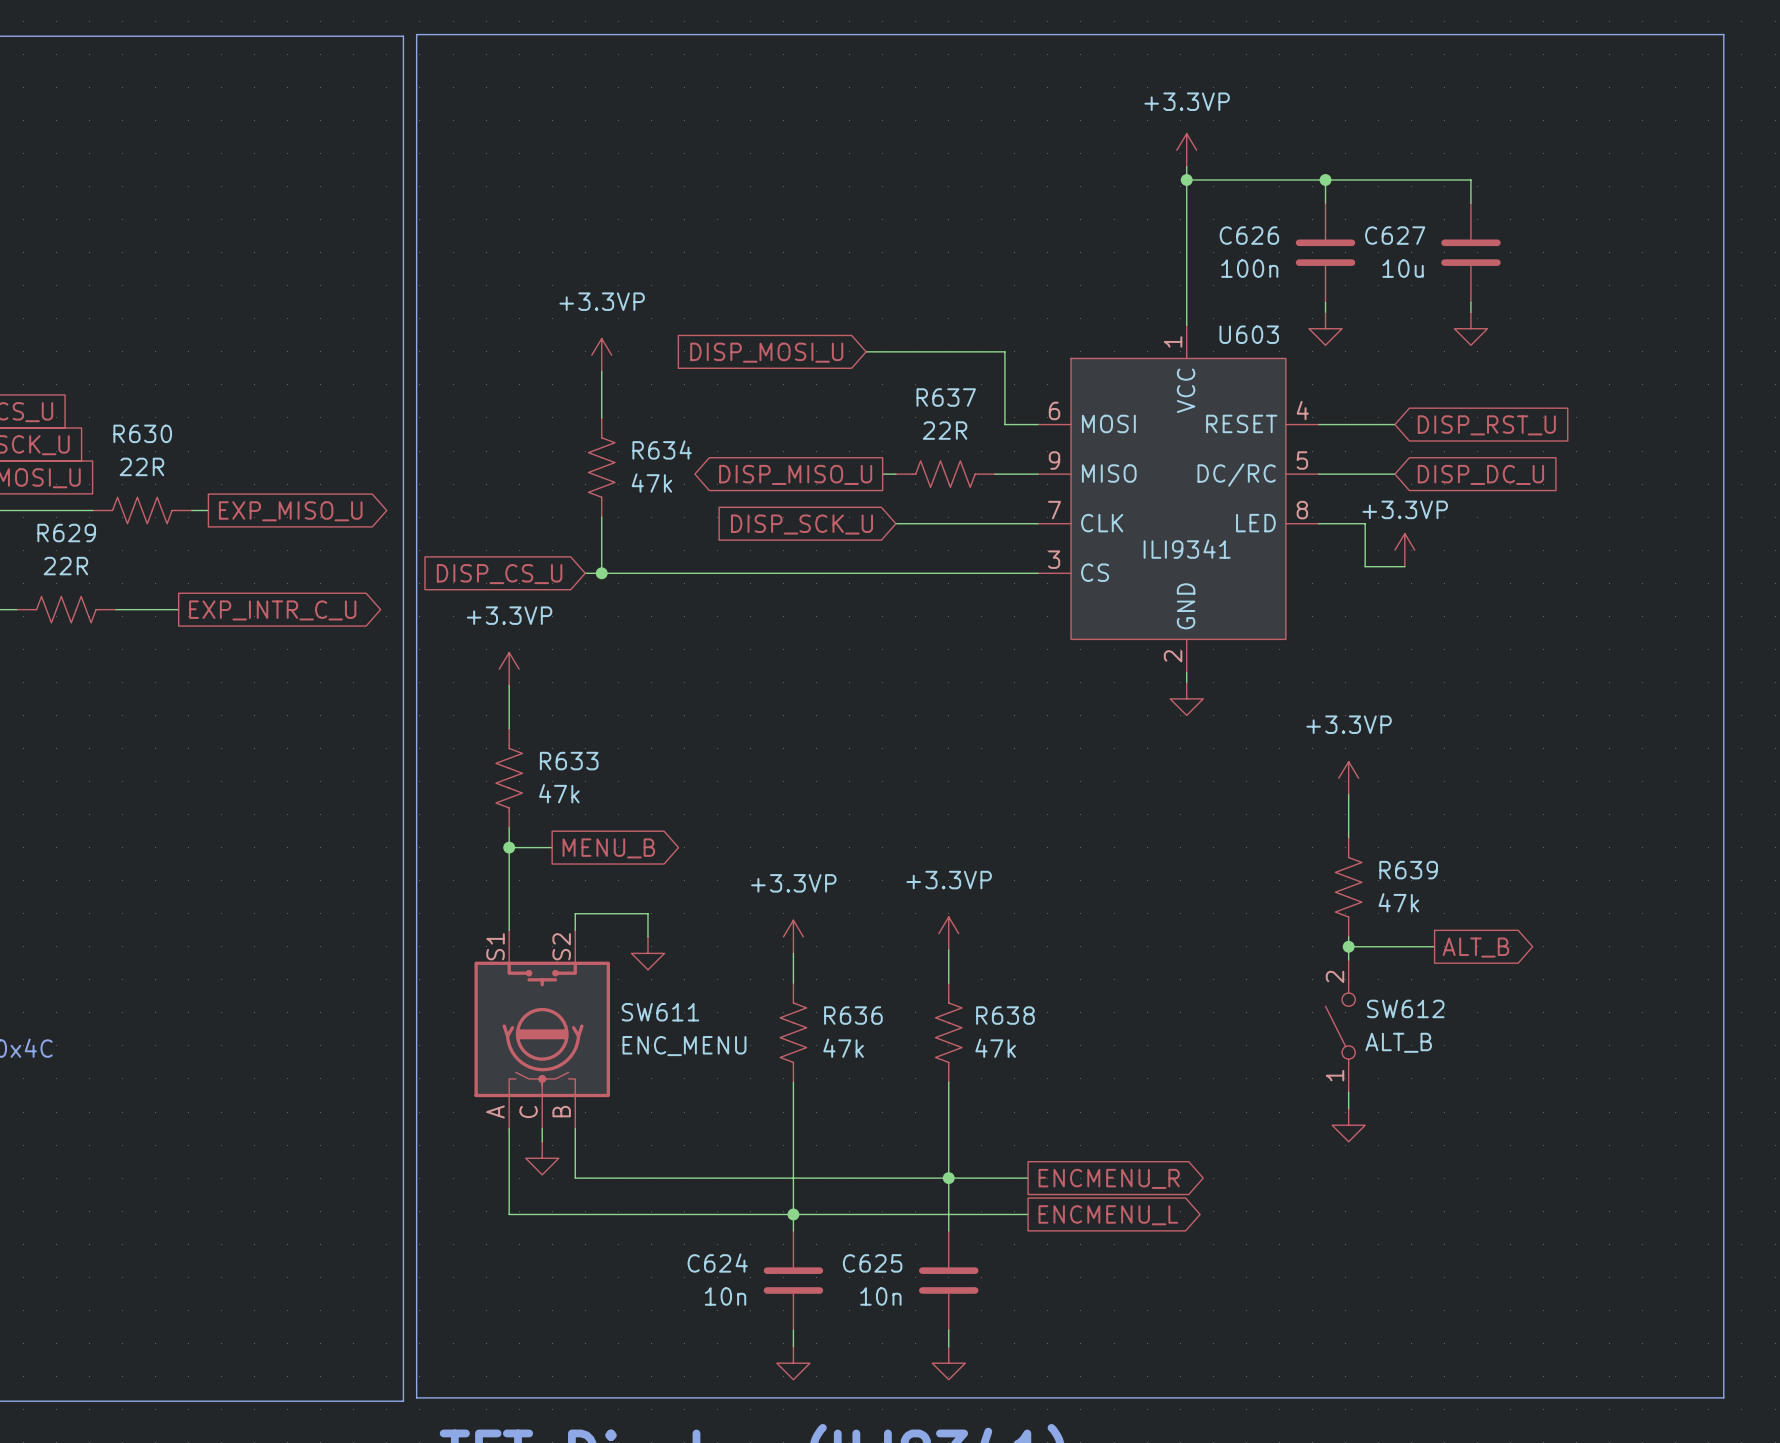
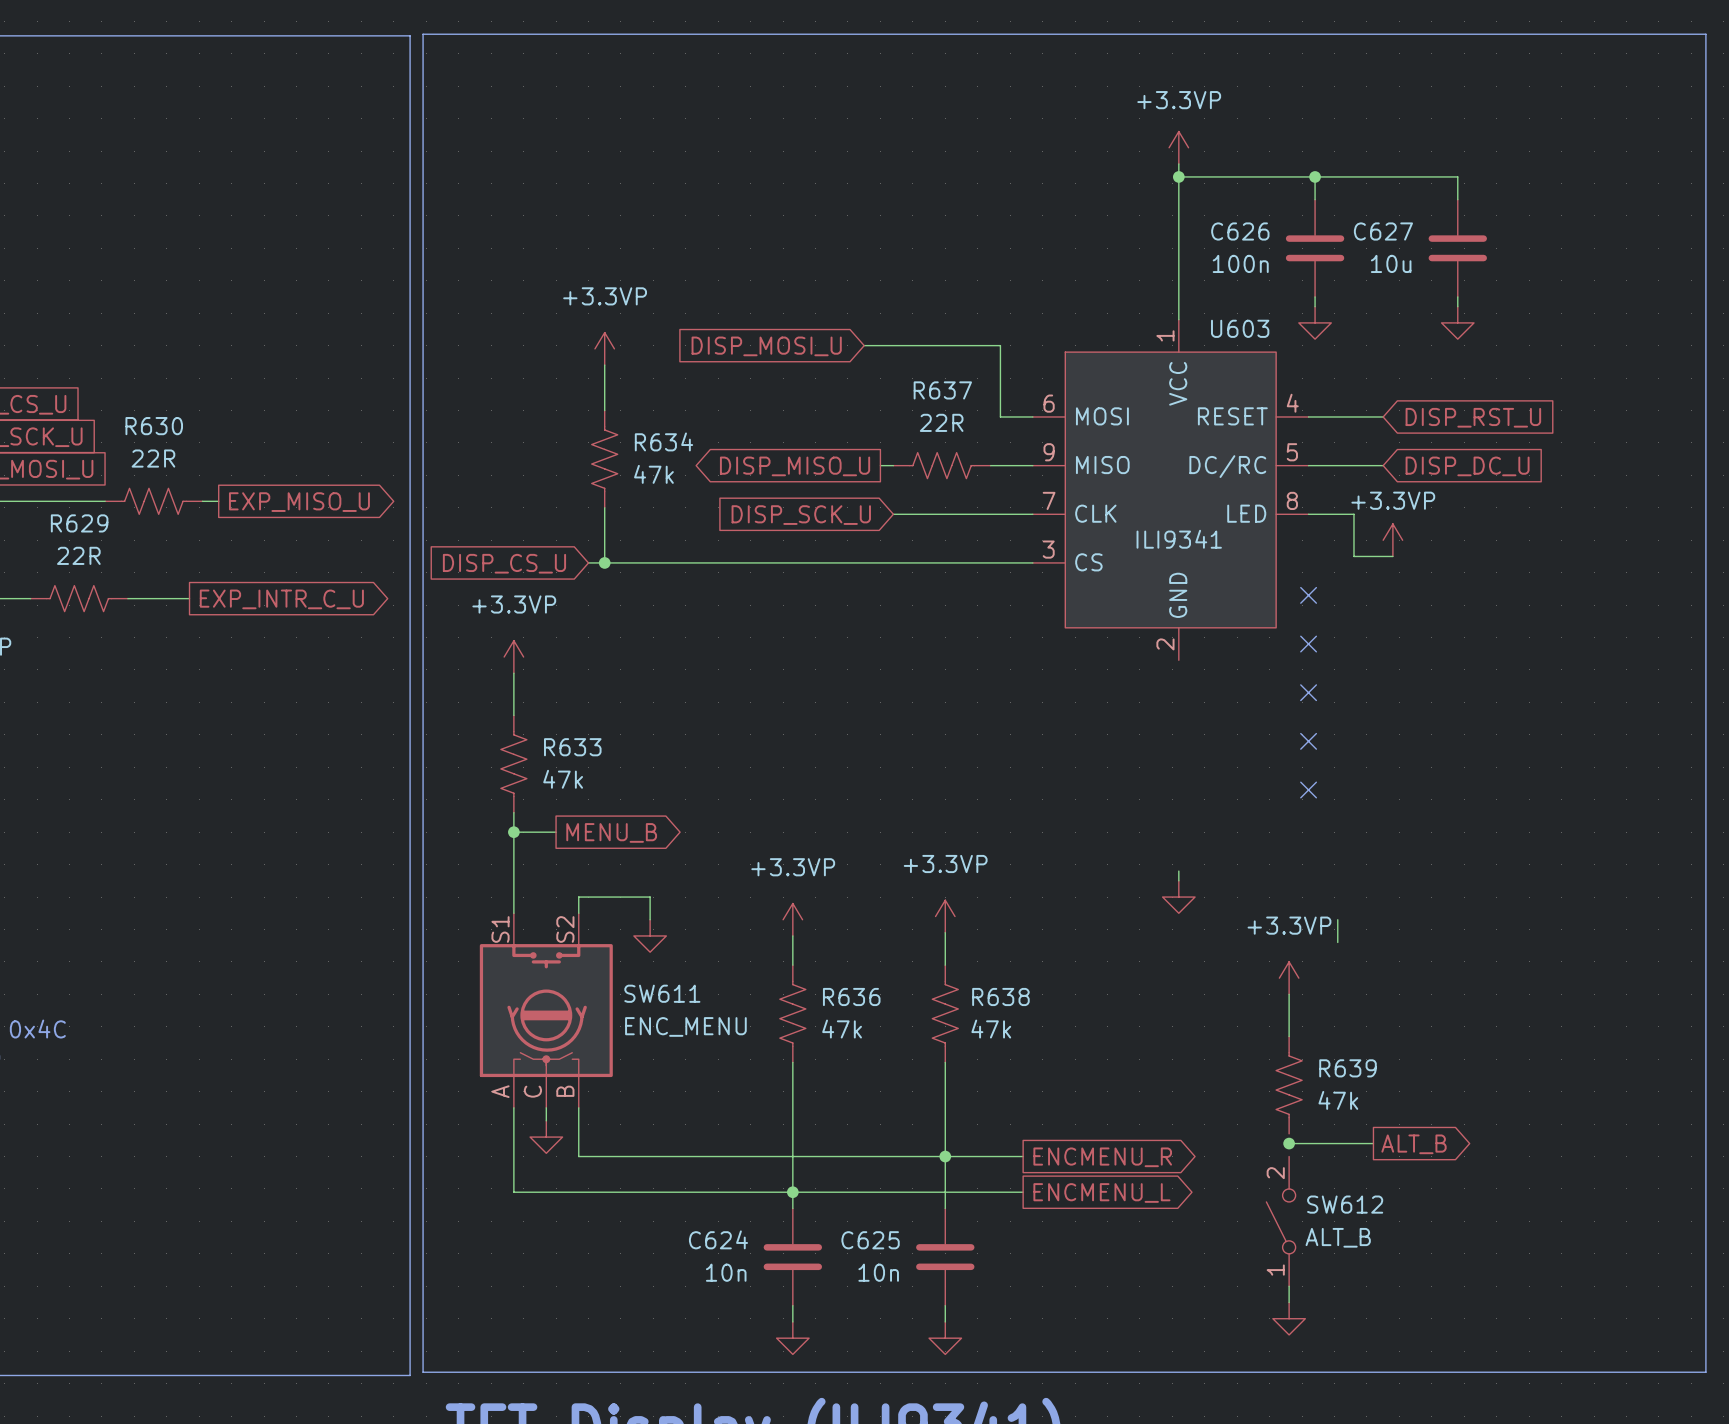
no-connect mark: none -> (1308, 595)
no-connect mark: none -> (1308, 644)
wire: (1186, 672) (1186, 682) -> (1178, 871) (1178, 880)
power symbol: (1186, 698) -> none
no-connect mark: none -> (1308, 692)
no-connect mark: none -> (1308, 741)
power symbol position: +3.3VP (1348, 778) -> +3.3VP (1289, 978)
wire: (1348, 794) (1348, 837) -> (1289, 994) (1289, 1036)
no-connect mark: none -> (1308, 790)
R639 position: (1348, 887) -> (1289, 1085)
power symbol: none -> (1178, 897)
wire: (1348, 946) (1434, 946) -> (1289, 1143) (1373, 1143)
junction: (1348, 946) -> none
global label position: ALT_B (1475, 947) -> ALT_B (1414, 1144)
SW612 position: (1340, 1026) -> (1281, 1221)
wire: (1348, 1092) (1348, 1108) -> (1289, 1286) (1289, 1302)
power symbol: (1348, 1125) -> none
junction: none -> (1289, 1143)
power symbol: none -> (1289, 1318)

